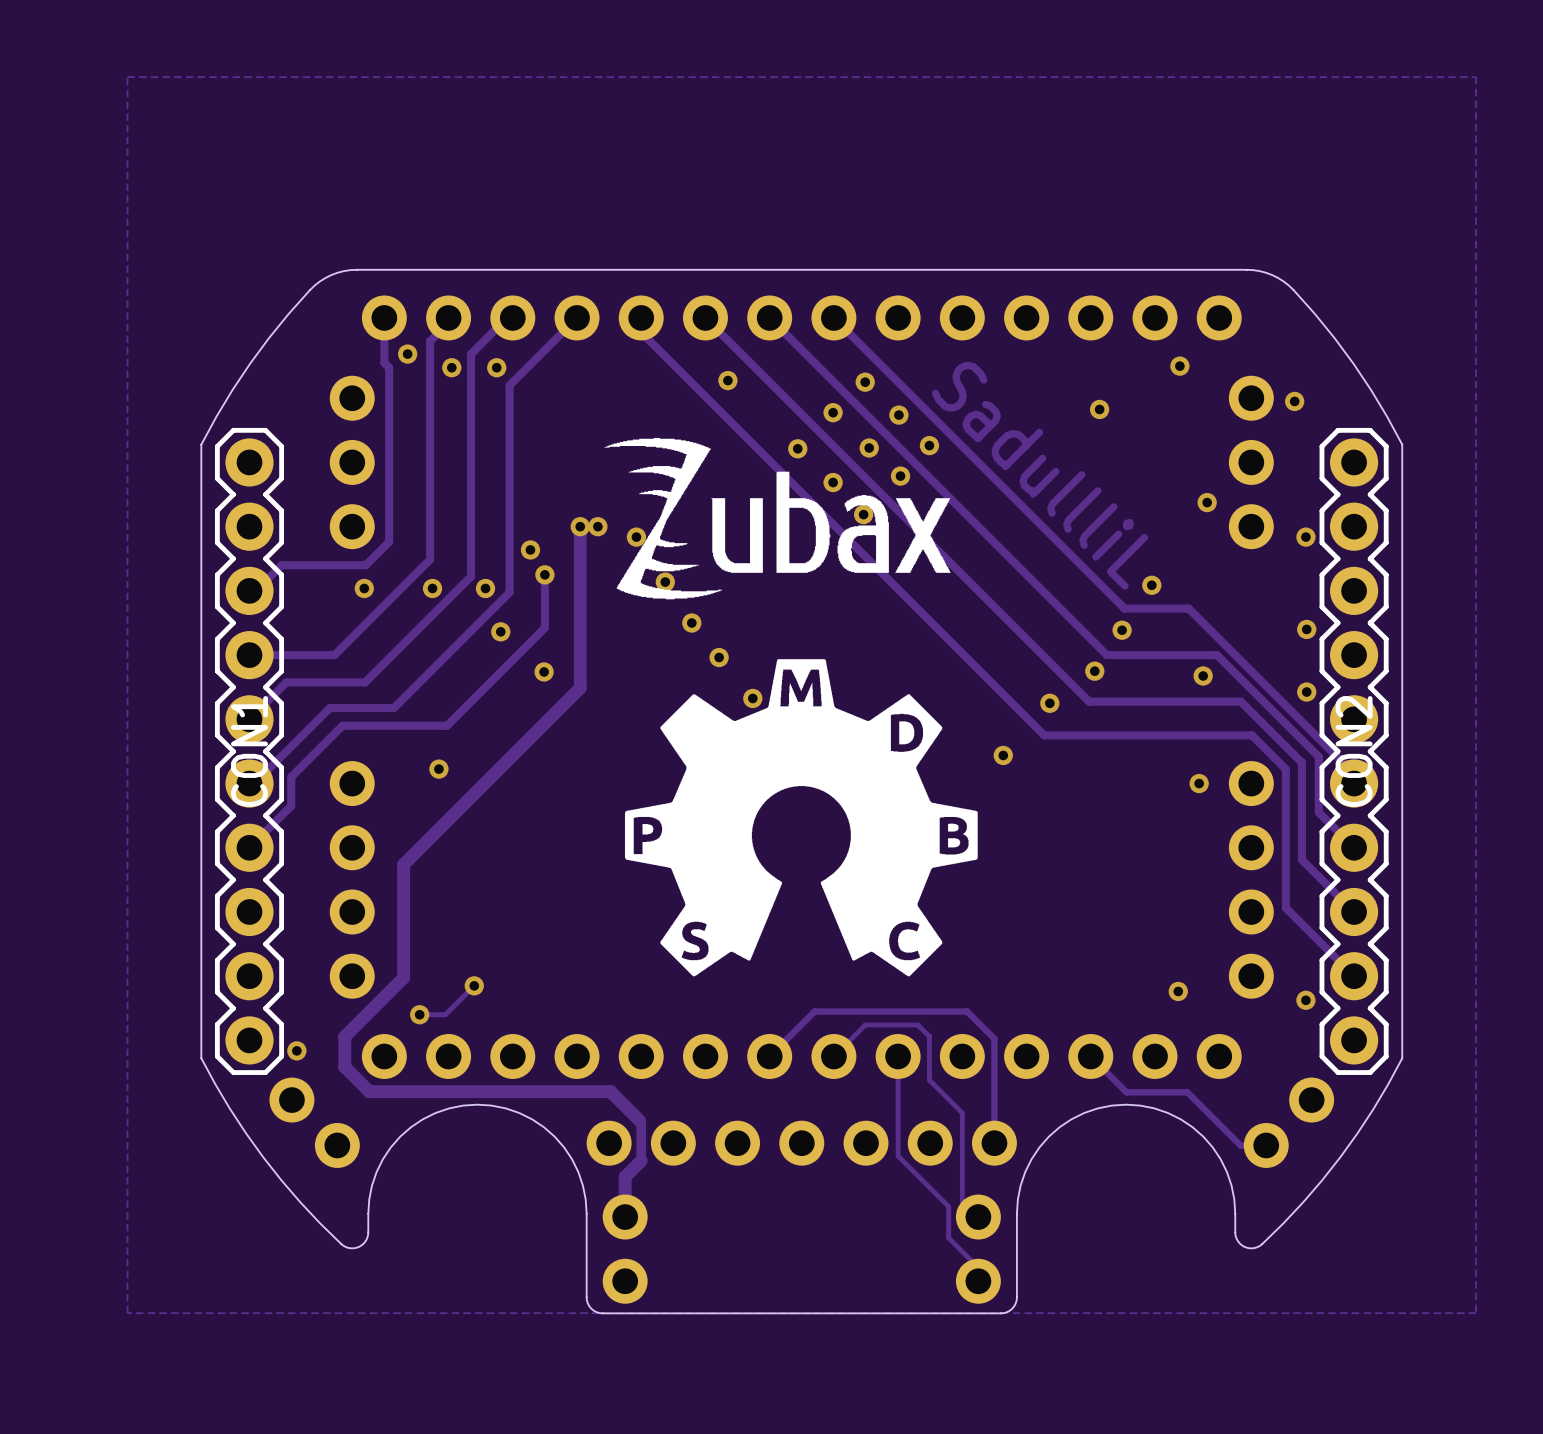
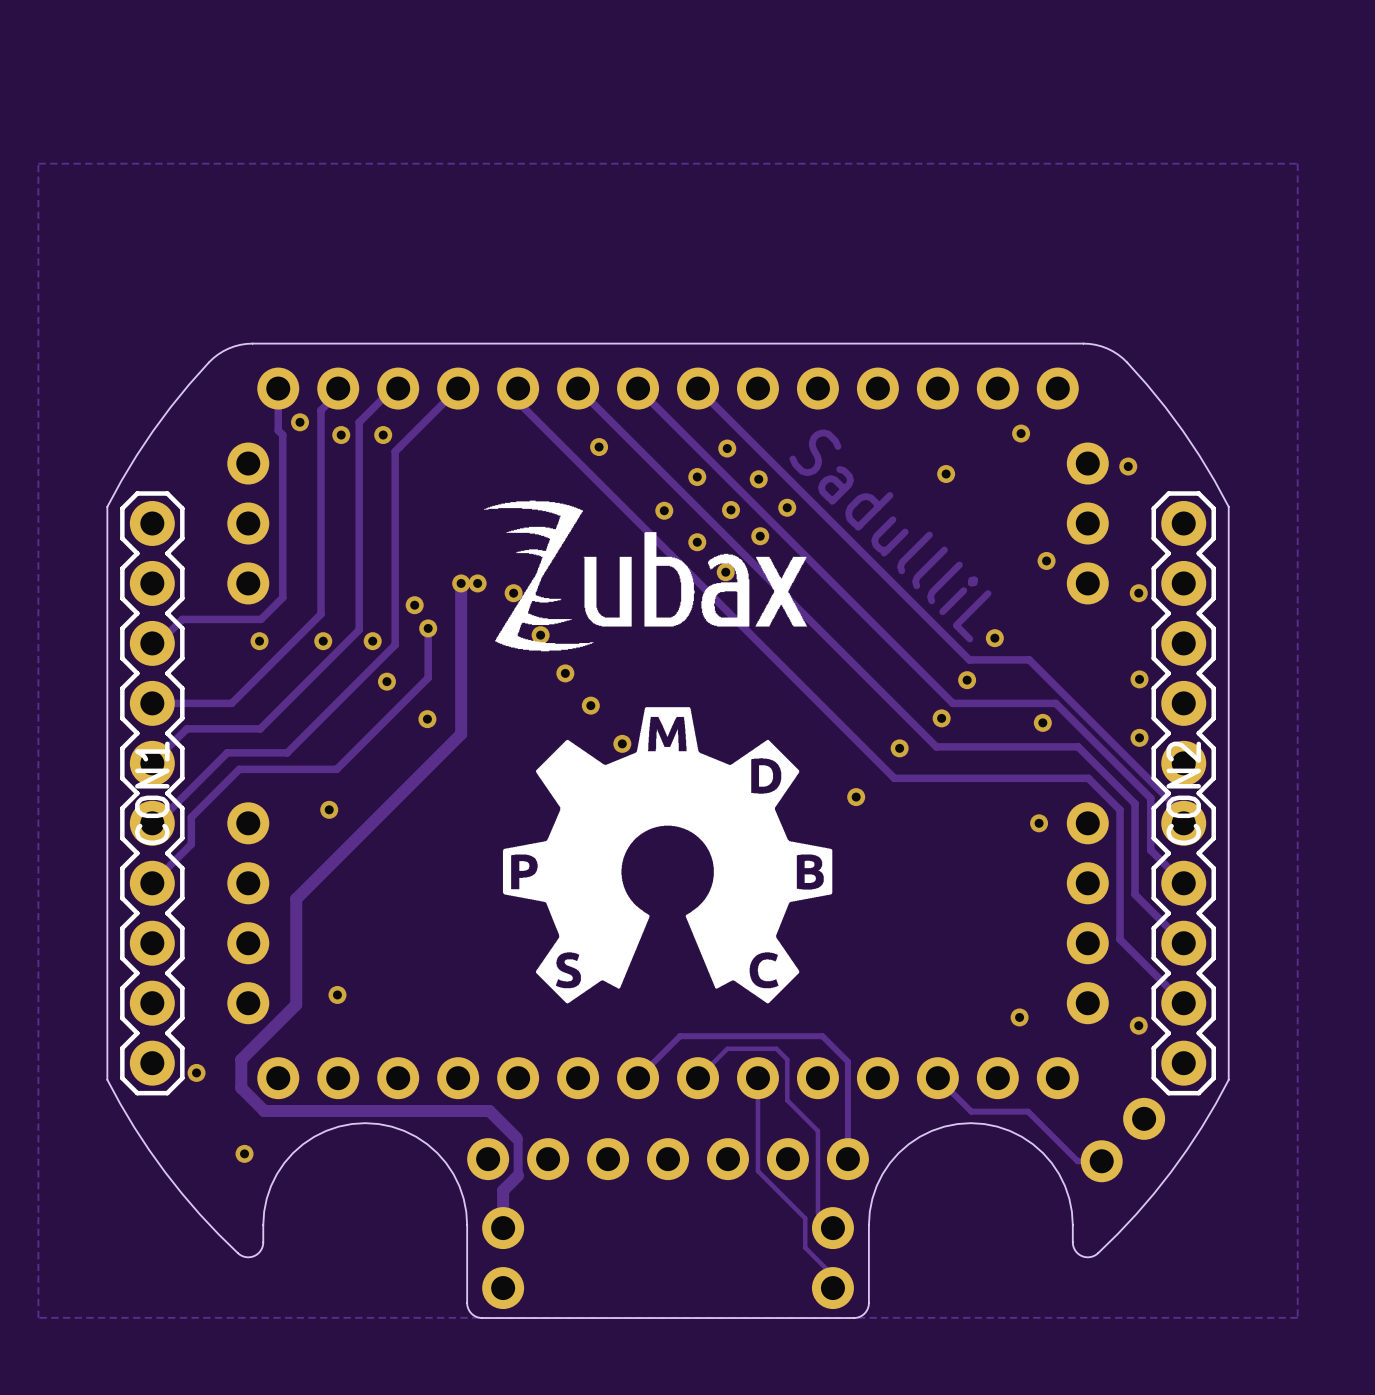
via: none -> (337, 994)
track: (474, 985) (445, 1014) (419, 1014) -> none
via: (474, 985) -> none
via: (419, 1014) -> none
part: (314, 1122) -> none
via: none -> (244, 1153)

